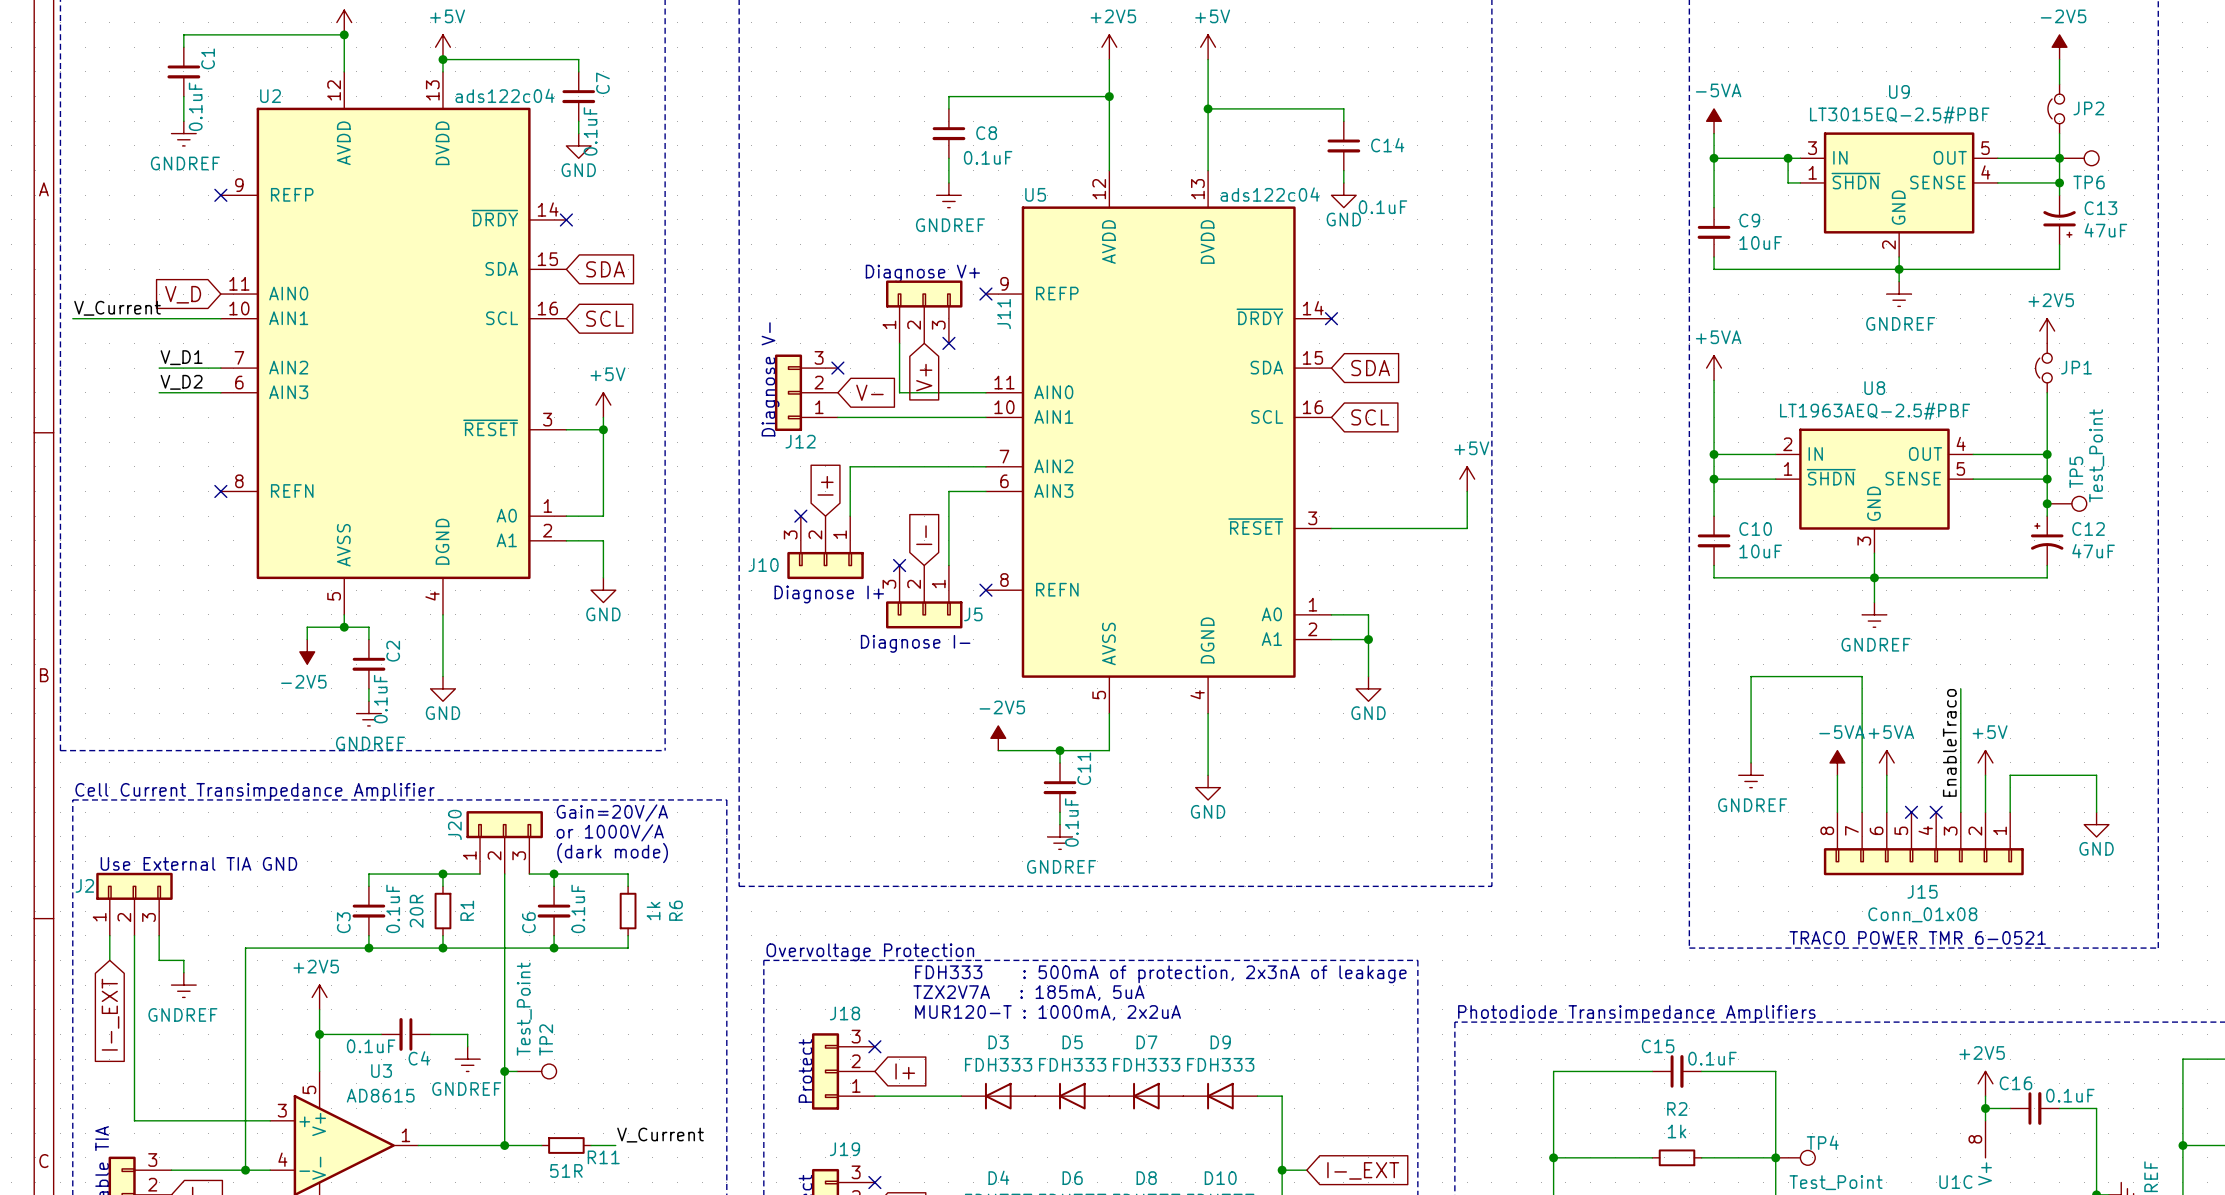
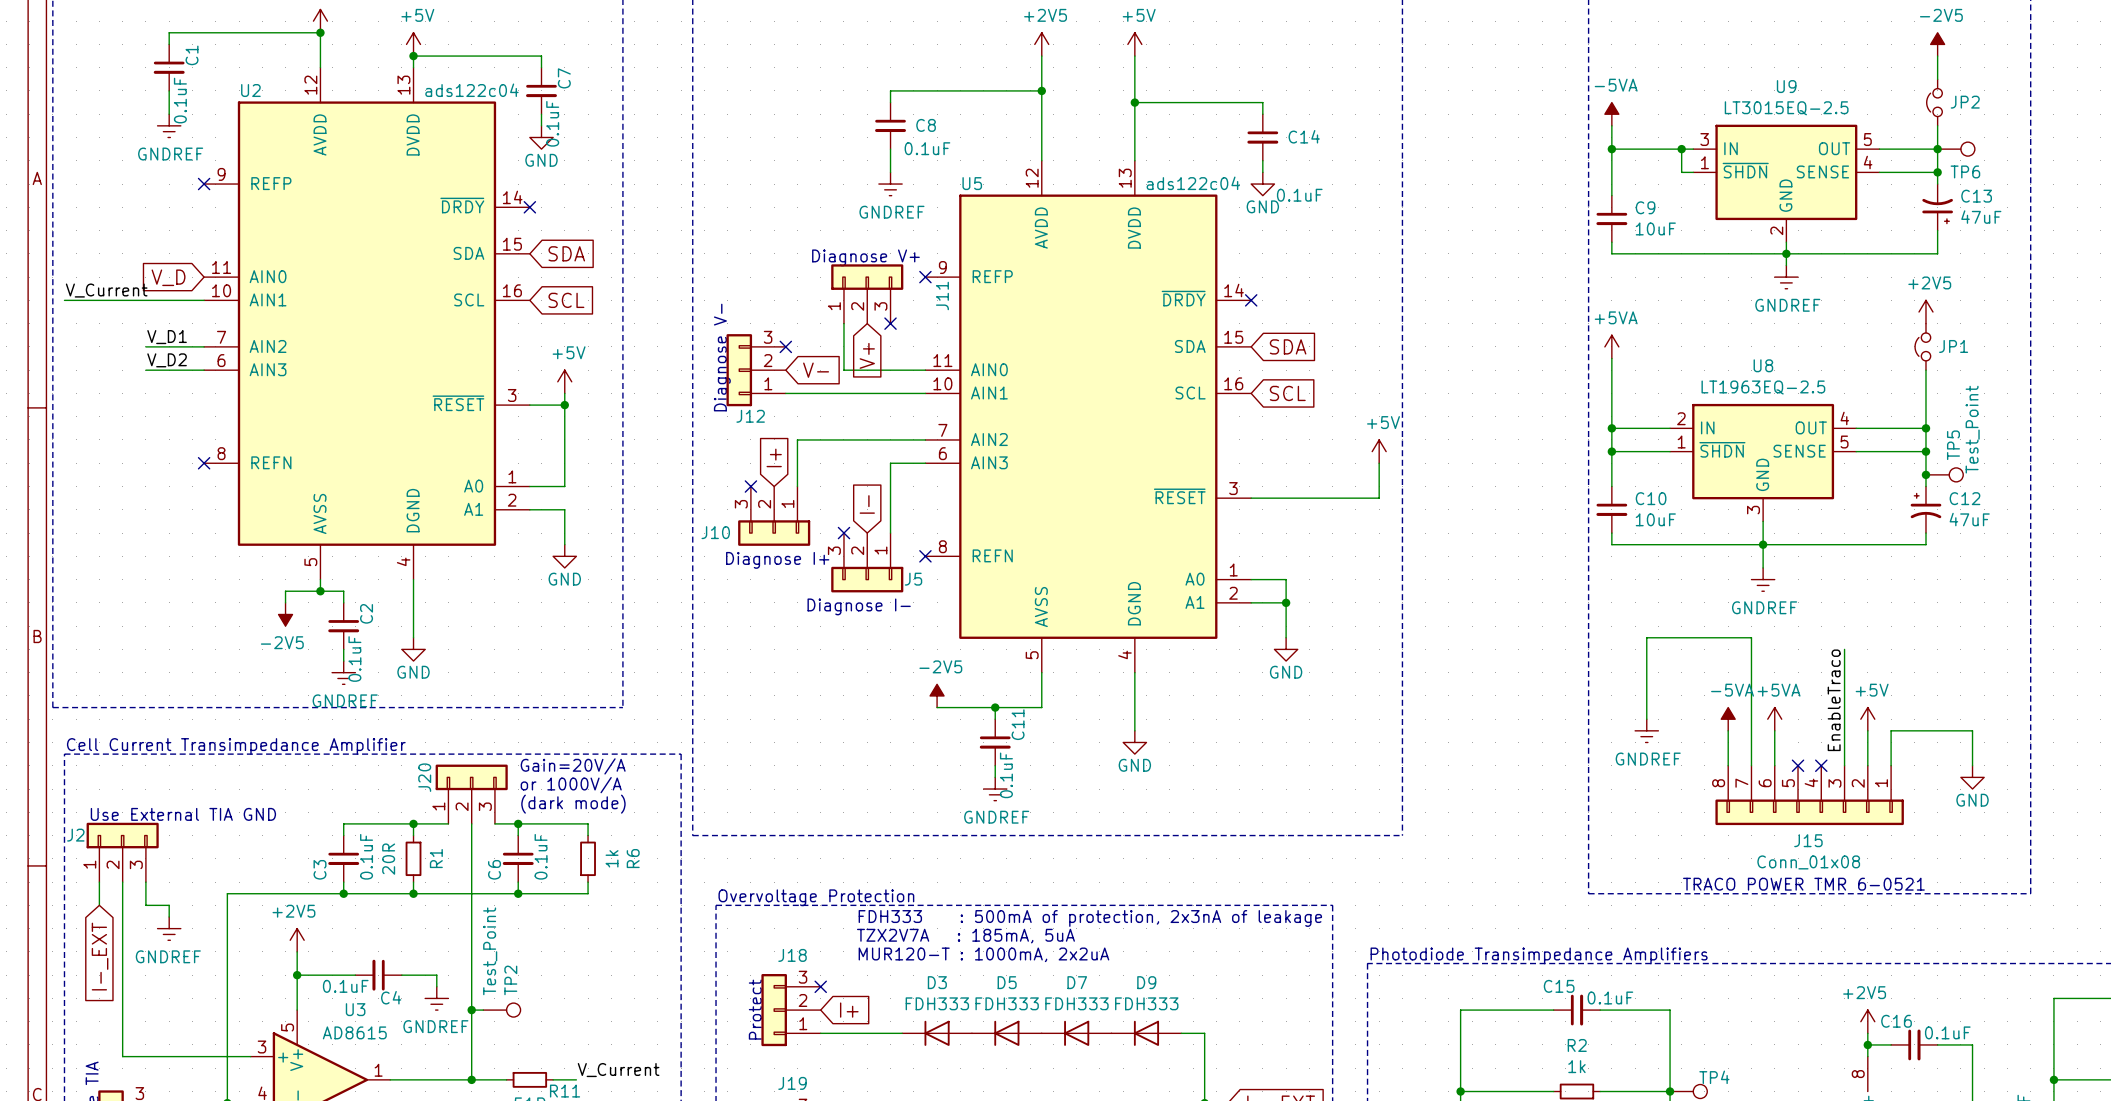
U9 value: LT3015EQ-2.5#PBF (1899, 114) -> LT3015EQ-2.5 (1786, 108)
U8 value: LT1963AEQ-2.5#PBF (1875, 411) -> LT1963EQ-2.5 (1763, 387)

